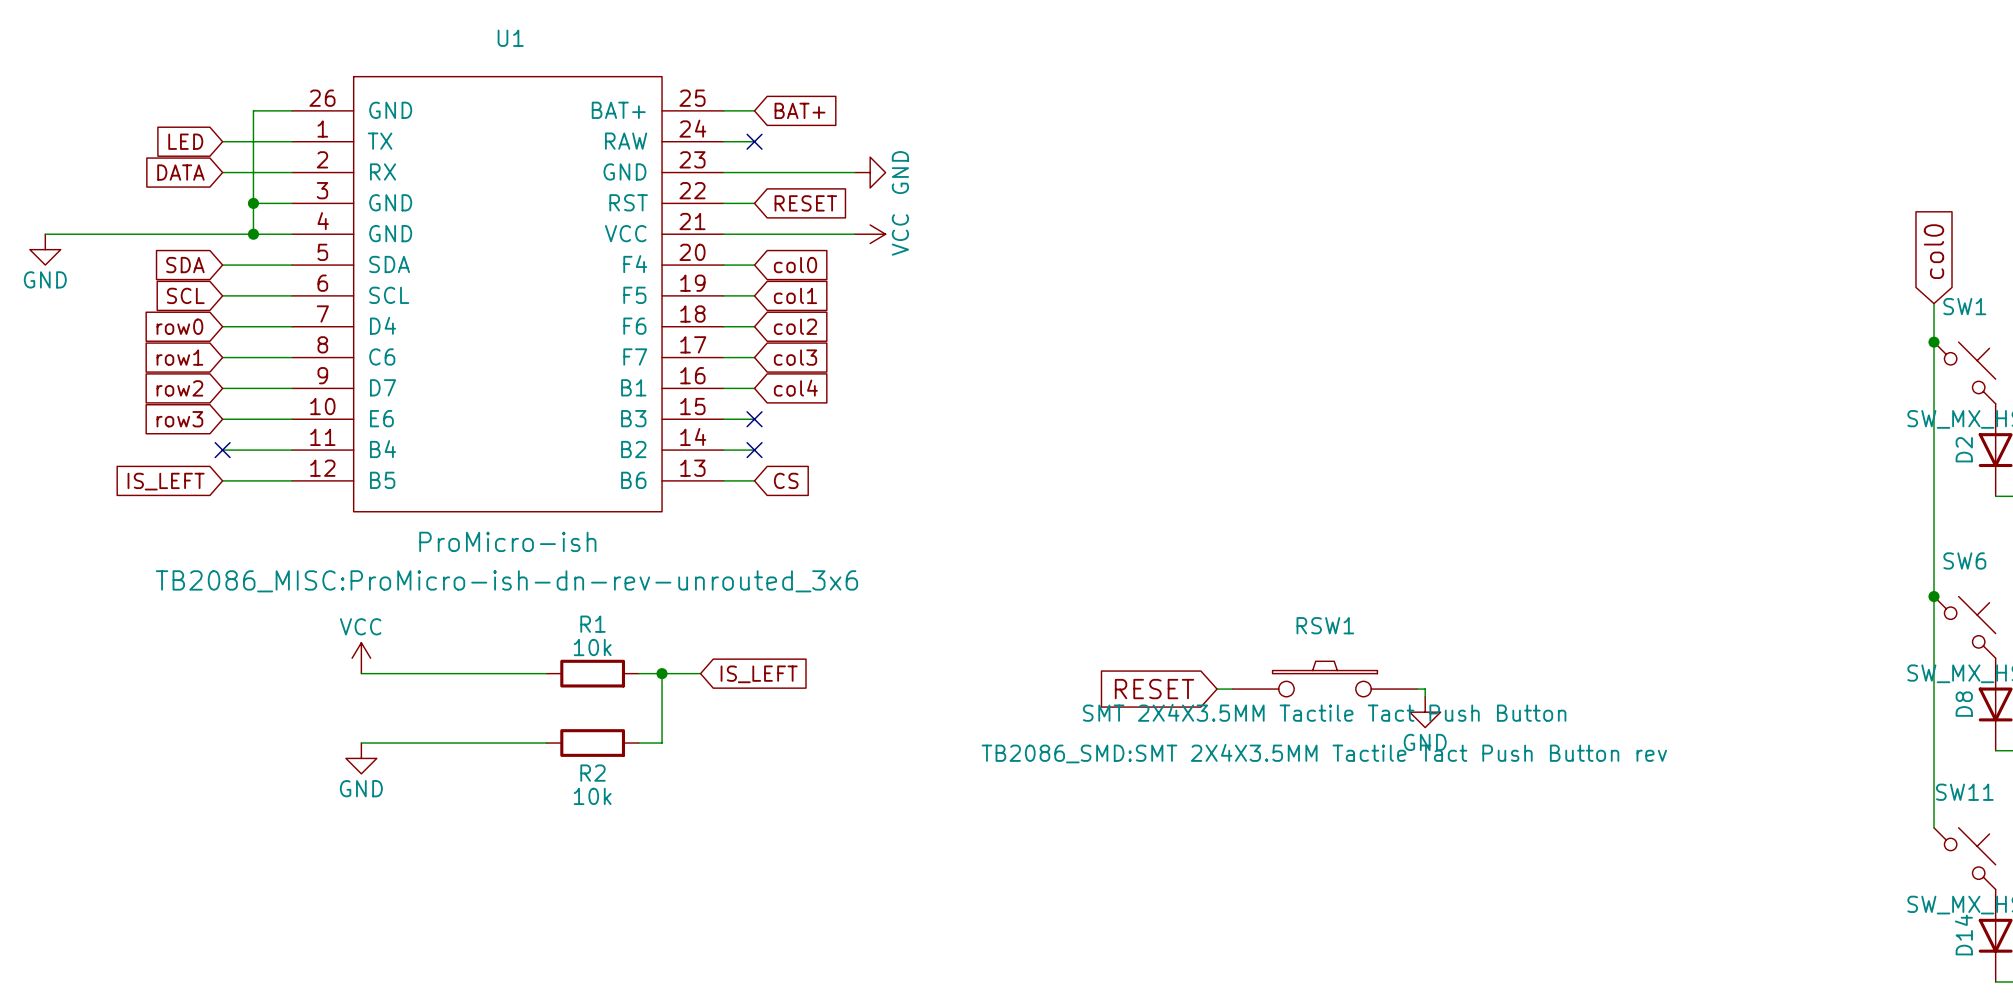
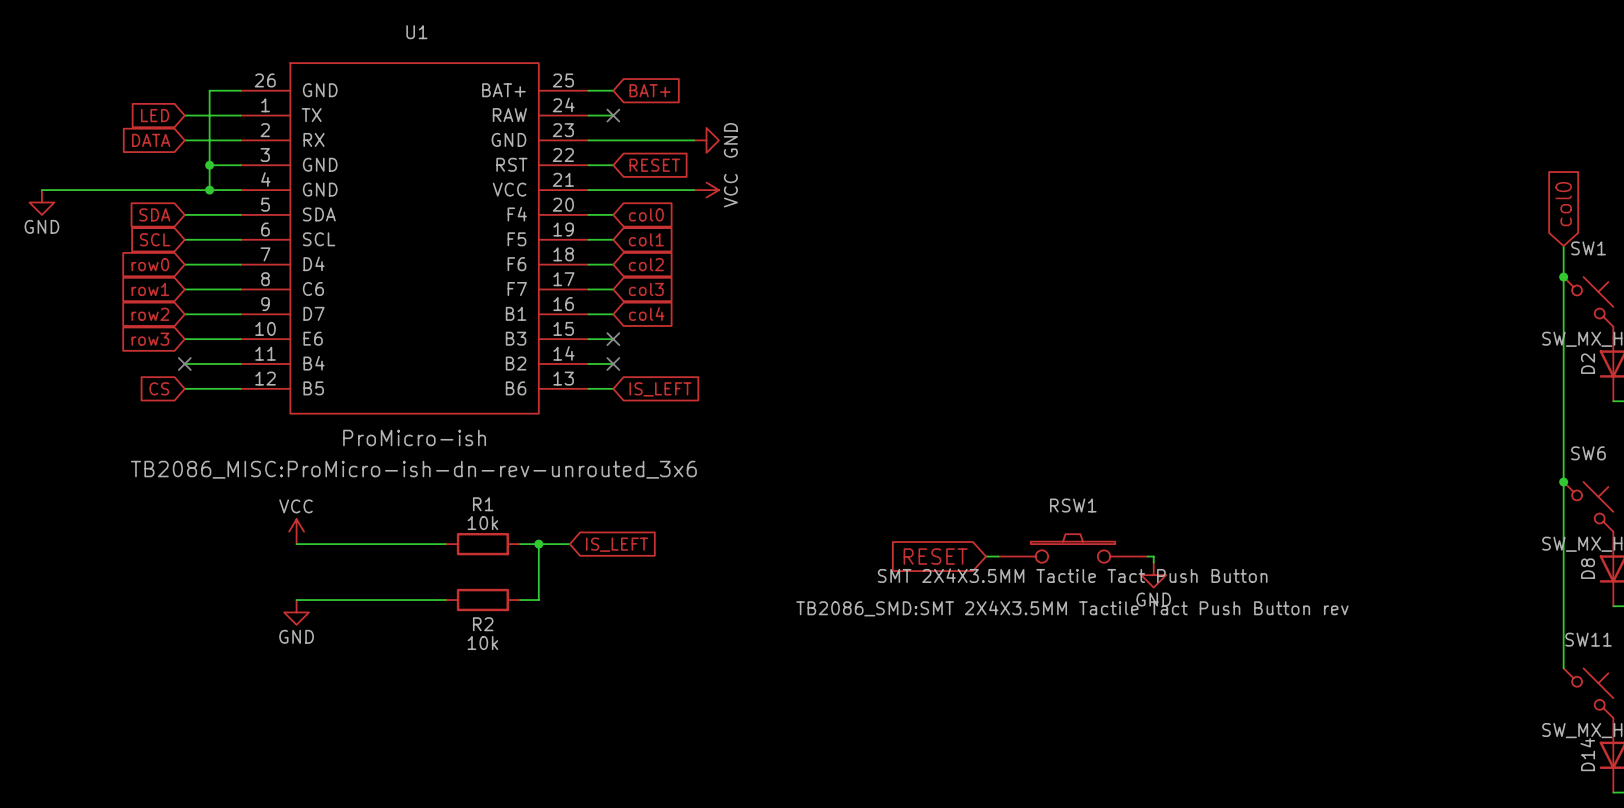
global label: CS (786, 480) -> IS_LEFT (660, 389)
global label: IS_LEFT (166, 481) -> CS (159, 388)

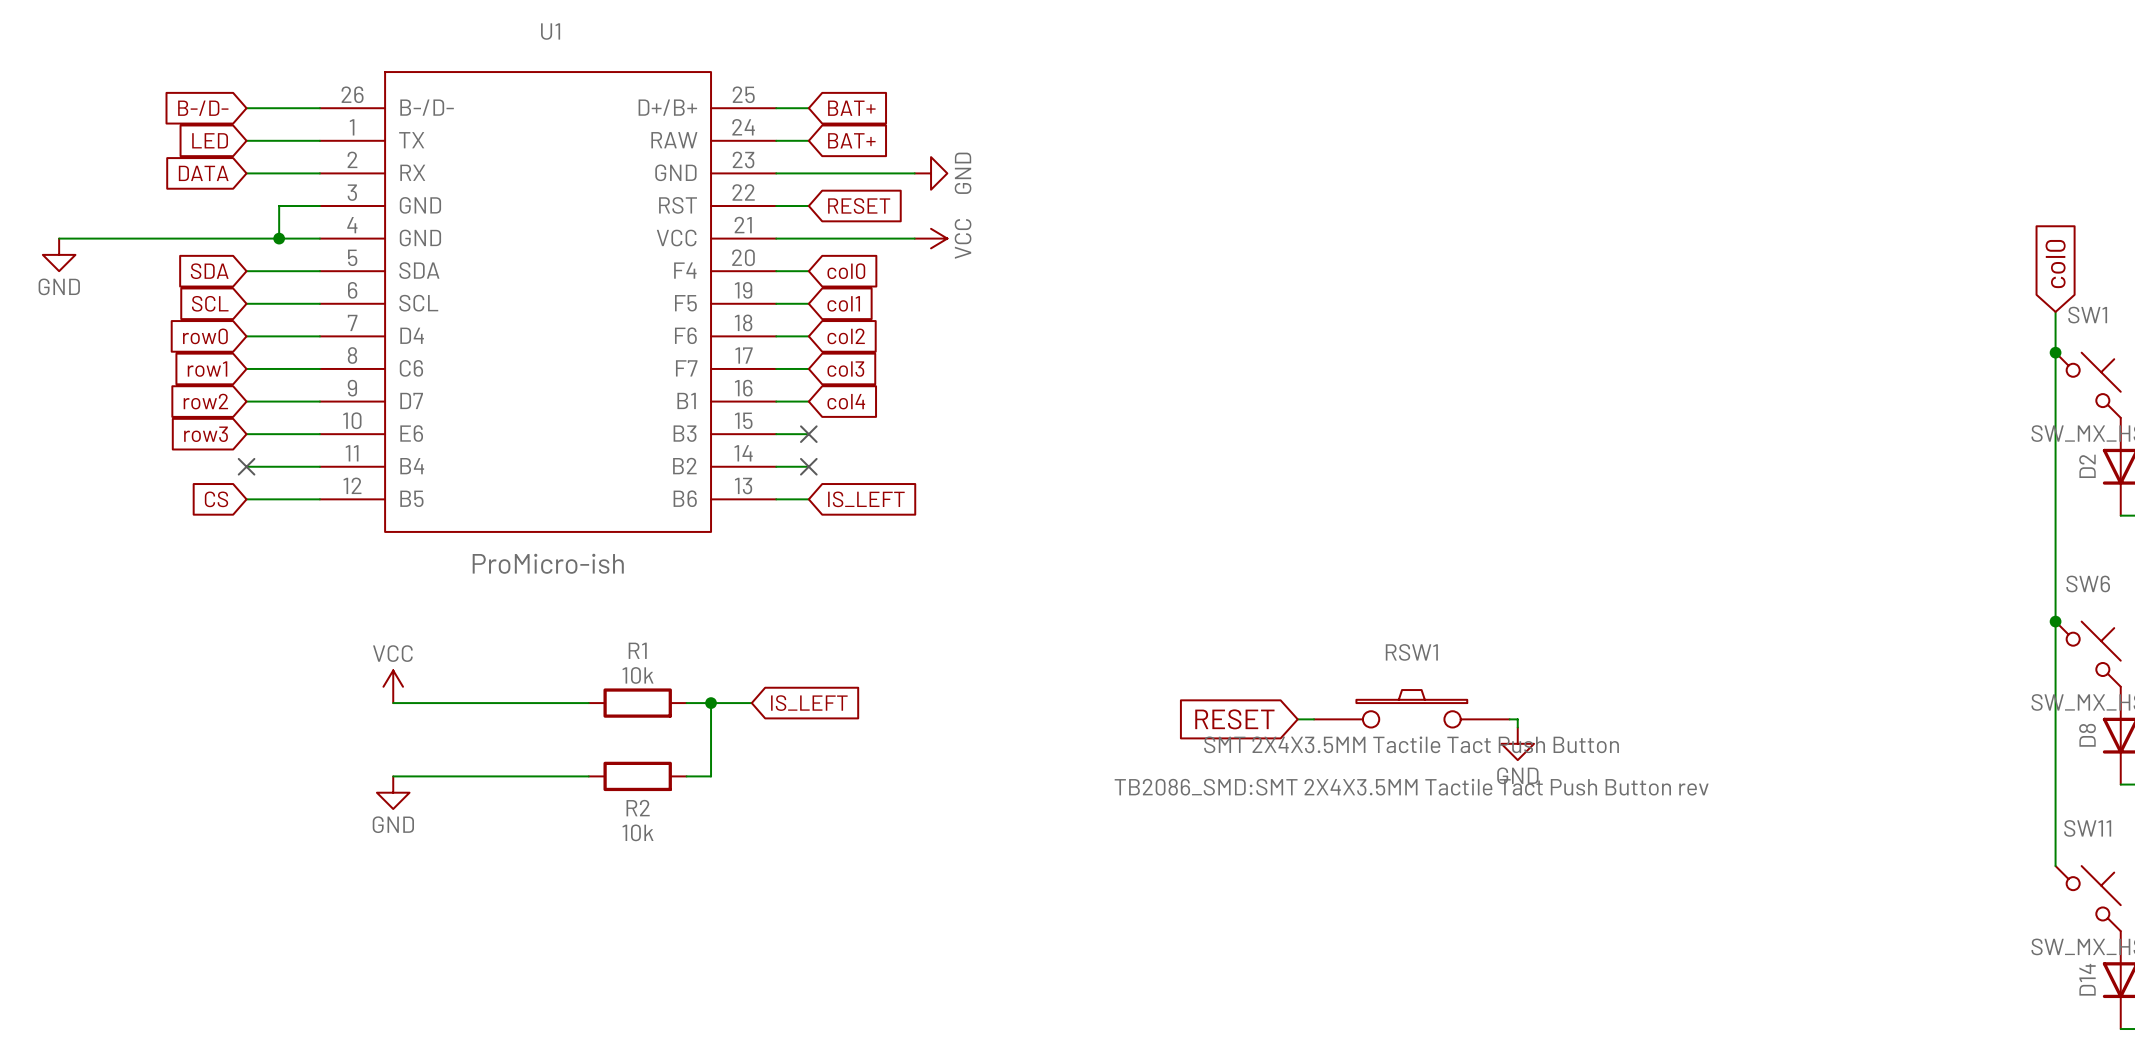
wire: (209, 90) (209, 165) -> (279, 108) (246, 108)
U1 pin name: GND (320, 90) -> B-/D- (427, 107)
U1 pin name: BAT+ (503, 90) -> D+/B+ (667, 107)
global label: none -> B-/D- (203, 108)
no-connect mark: (613, 115) -> none
global label: none -> BAT+ (851, 140)
junction: (209, 165) -> none
U1 text: TB2086_MISC:ProMicro-ish-dn-rev-unrouted_3x6 (413, 469) -> none

